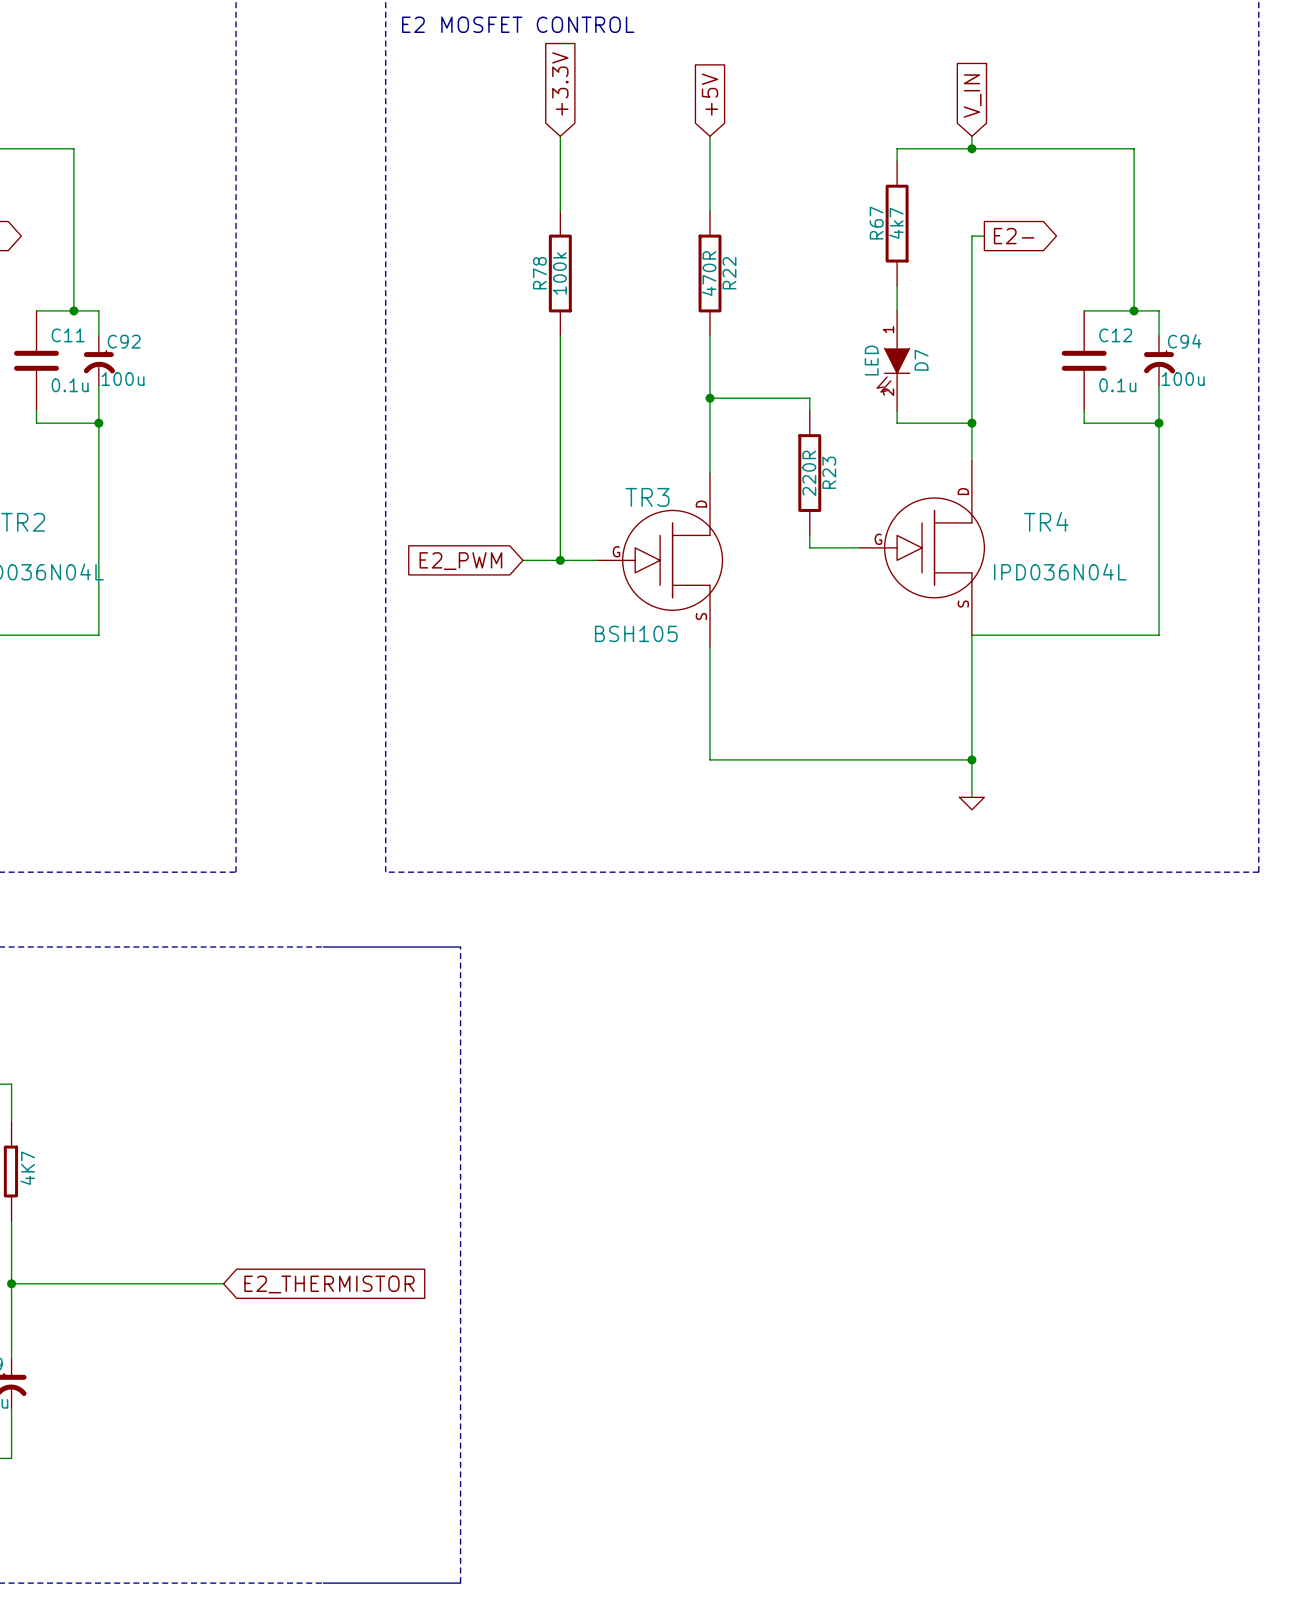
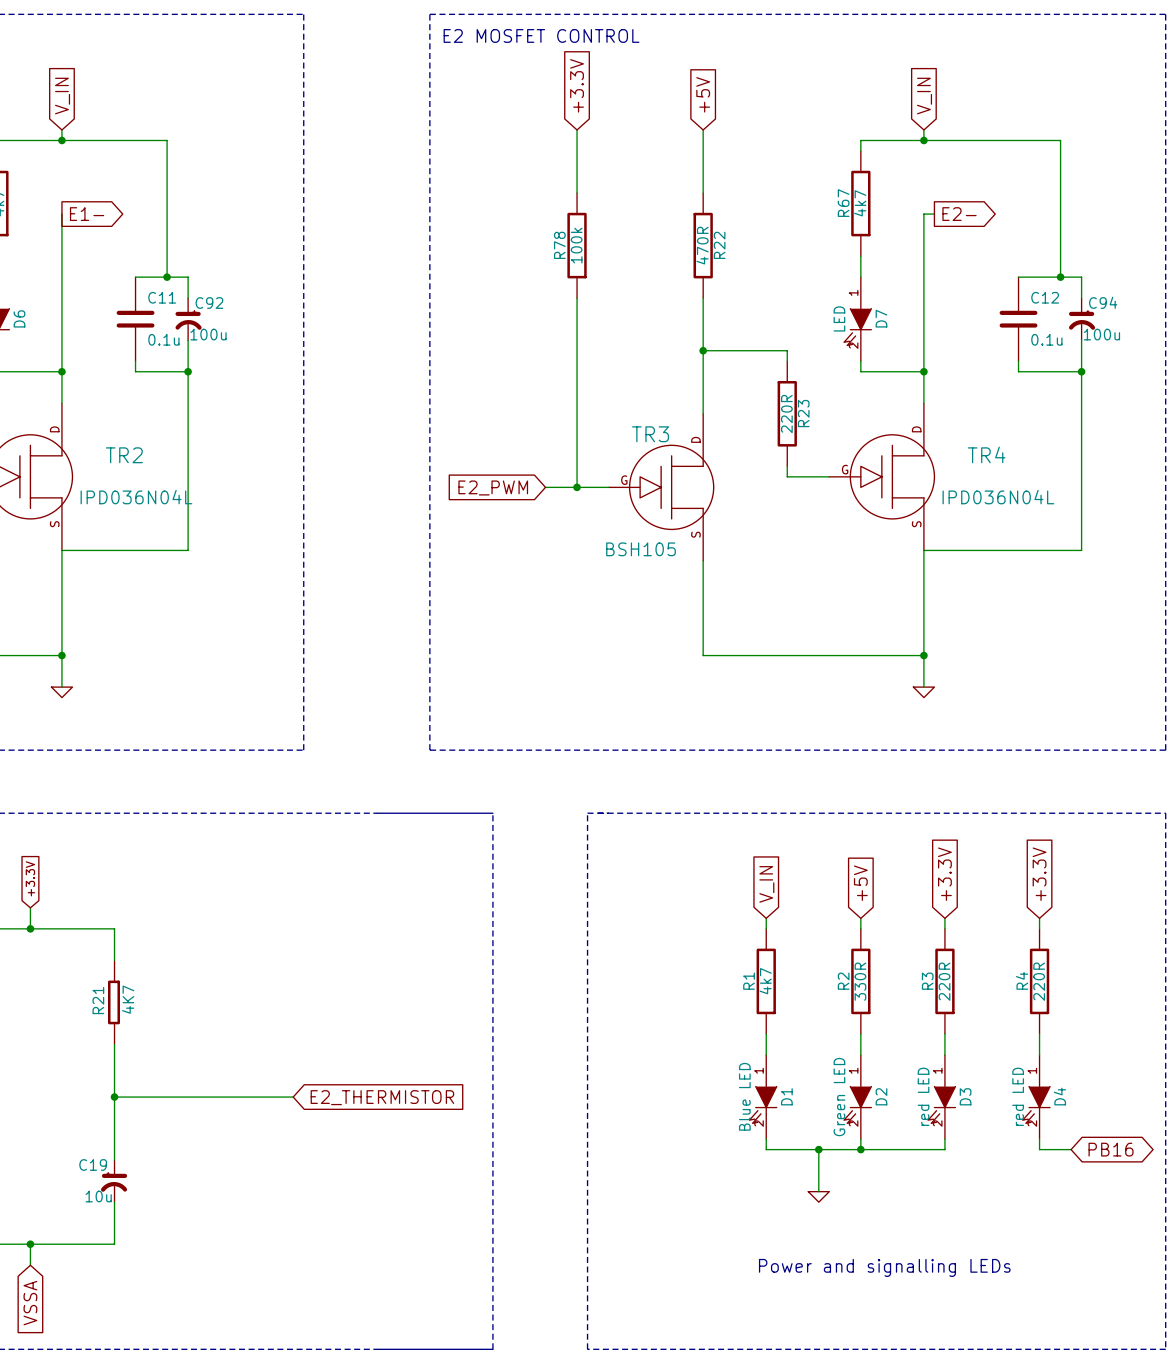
line: none -> (587, 813) (1165, 813) (1165, 1349) (587, 1349) (587, 813)
global label: none -> +3.3V (944, 874)
global label: none -> +3.3V (1039, 874)
global label: none -> +5V (860, 883)
global label: none -> V_IN (766, 884)
wire: none -> (766, 918) (766, 928)
wire: none -> (860, 918) (860, 928)
wire: none -> (944, 918) (944, 928)
wire: none -> (1039, 918) (1039, 928)
R1: none -> 4k7 (766, 981)
R2: none -> 330R (860, 981)
R3: none -> 220R (944, 981)
R4: none -> 220R (1039, 981)
wire: none -> (766, 1033) (766, 1055)
wire: none -> (860, 1033) (860, 1055)
wire: none -> (944, 1033) (944, 1055)
wire: none -> (1039, 1033) (1039, 1055)
D1: none -> Blue LED (763, 1097)
D2: none -> Green LED (857, 1097)
D3: none -> red LED (941, 1097)
D4: none -> red LED (1036, 1097)
wire: none -> (766, 1139) (766, 1149) (944, 1149) (944, 1139)
wire: none -> (860, 1139) (860, 1149)
wire: none -> (1039, 1139) (1039, 1149) (1071, 1149)
wire: none -> (818, 1149) (818, 1191)
junction: none -> (818, 1149)
junction: none -> (860, 1149)
global label: none -> PB16 (1111, 1149)
power symbol: none -> (818, 1196)
text: none -> Power and signalling LEDs (884, 1267)

